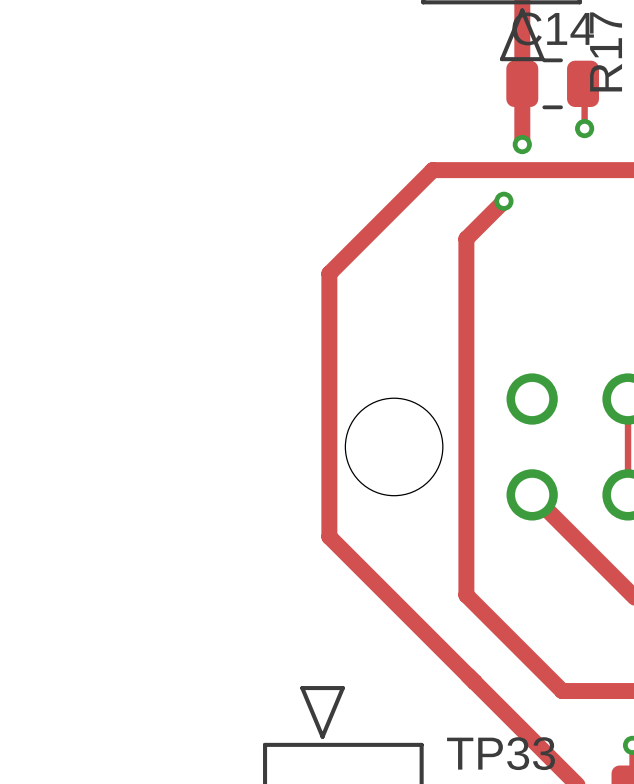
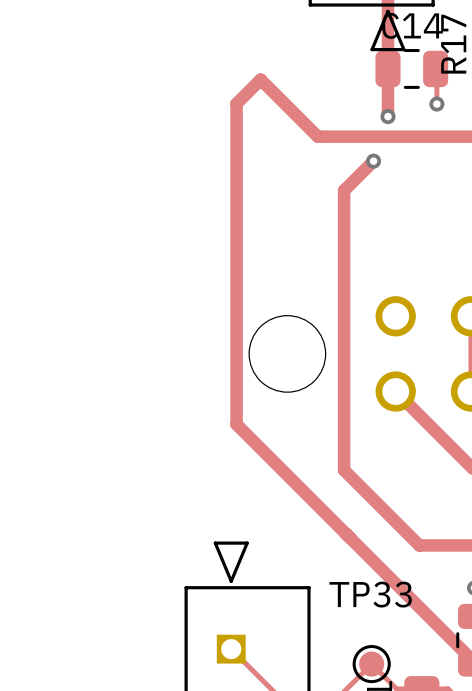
track: (432, 170) (329, 273) -> (317, 136) (260, 79) (236, 103) (236, 217)

